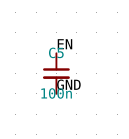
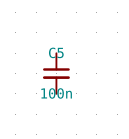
label: EN (64, 44) -> none
label: GND (68, 84) -> none

